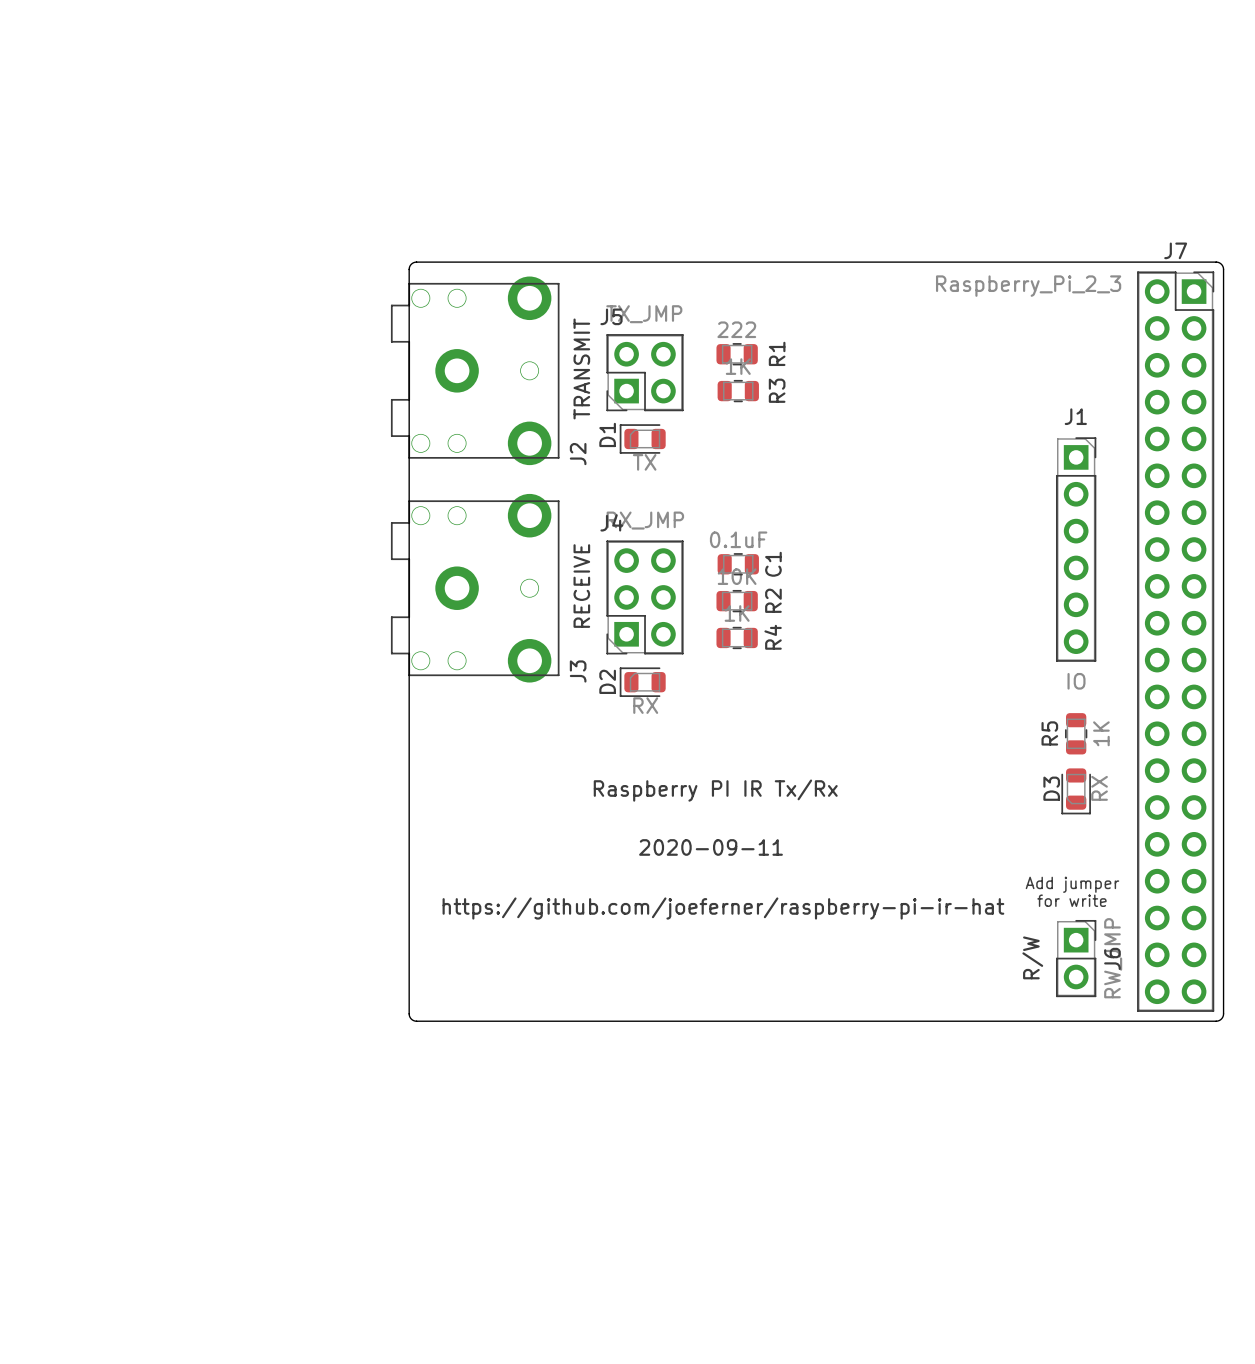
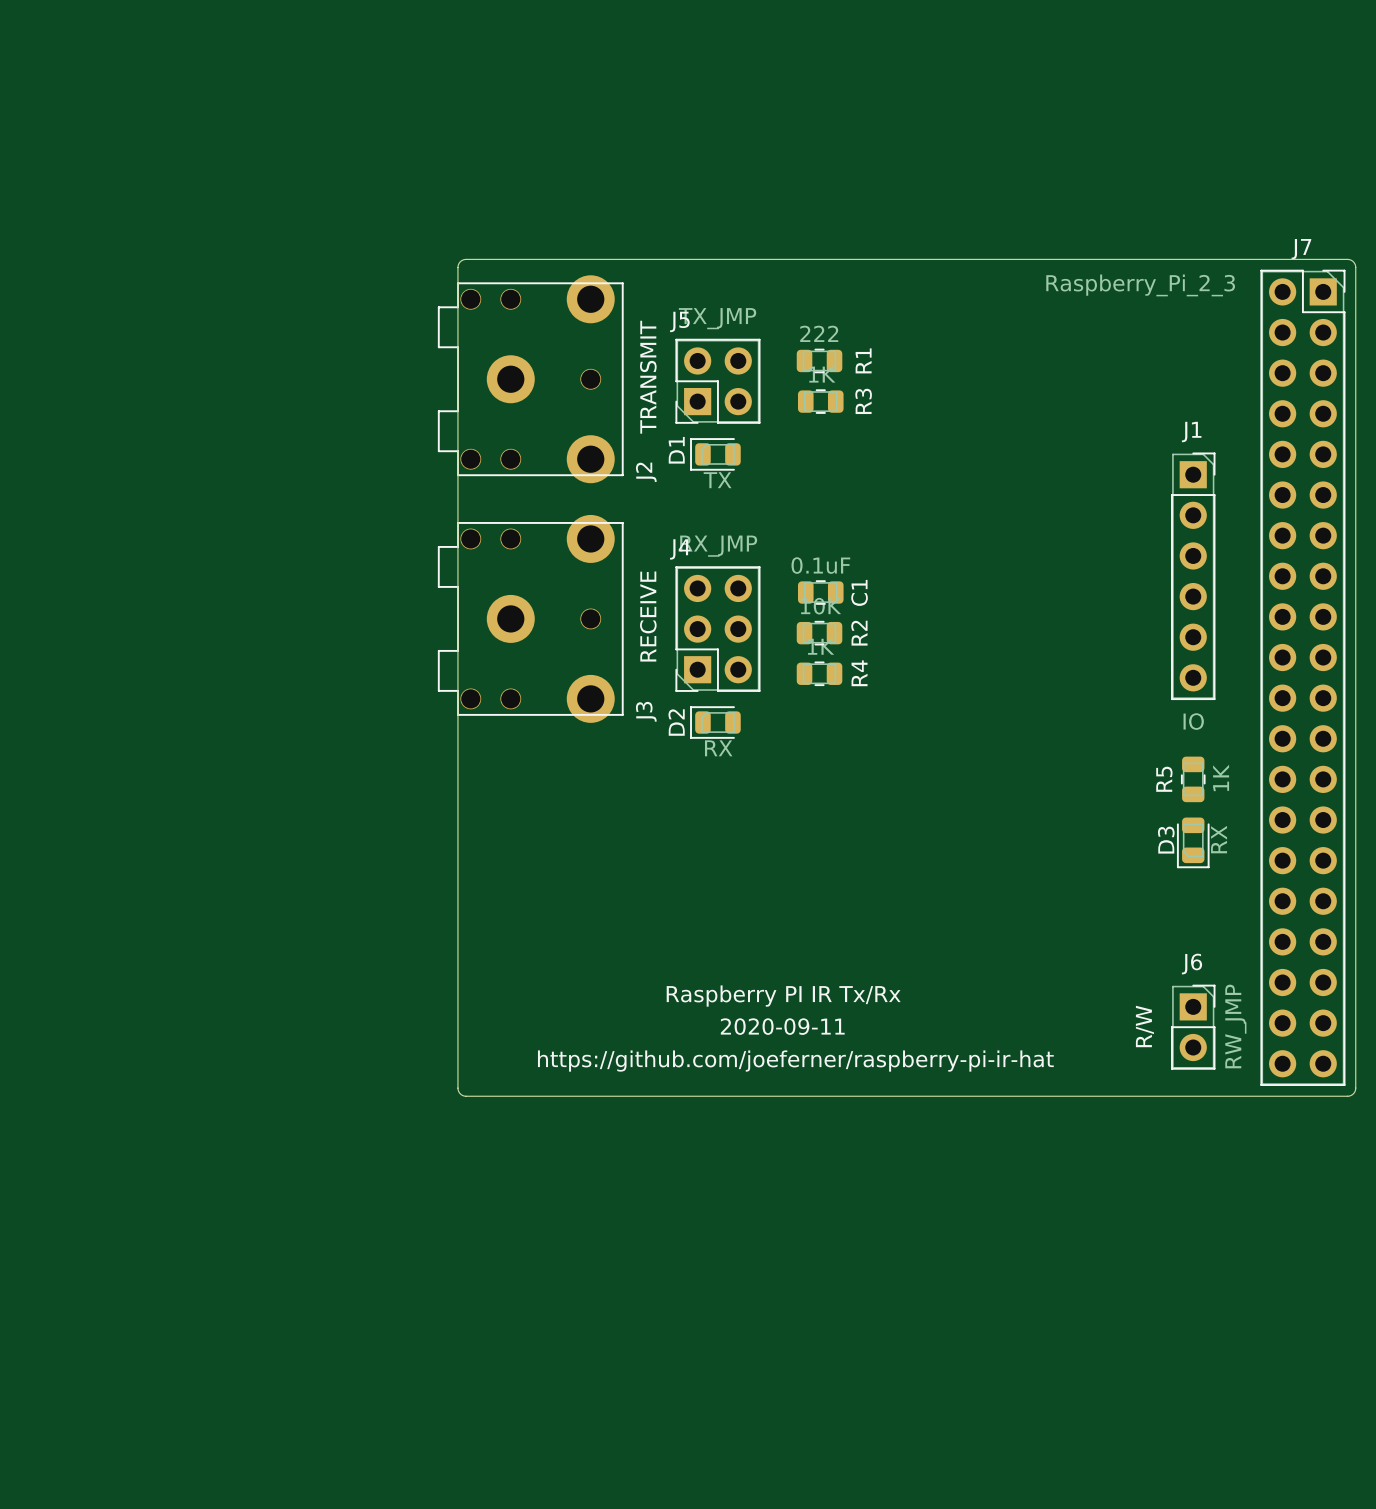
text position: Raspberry PI IR Tx/Rx (715, 790) -> Raspberry PI IR Tx/Rx (783, 996)
text position: 2020-09-11 (711, 847) -> 2020-09-11 (782, 1026)
text: Add jumper (1072, 884) -> none
text: for write (1071, 900) -> none
text position: https://github.com/joeferner/raspberry-pi-ir-hat (723, 908) -> https://github.com/joeferner/raspberry-pi-ir-hat (795, 1061)
J6 name rotation: 0° (1112, 958) -> 90° clockwise (1191, 964)
J6 name position: J6 (1112, 958) -> J6 (1191, 964)

